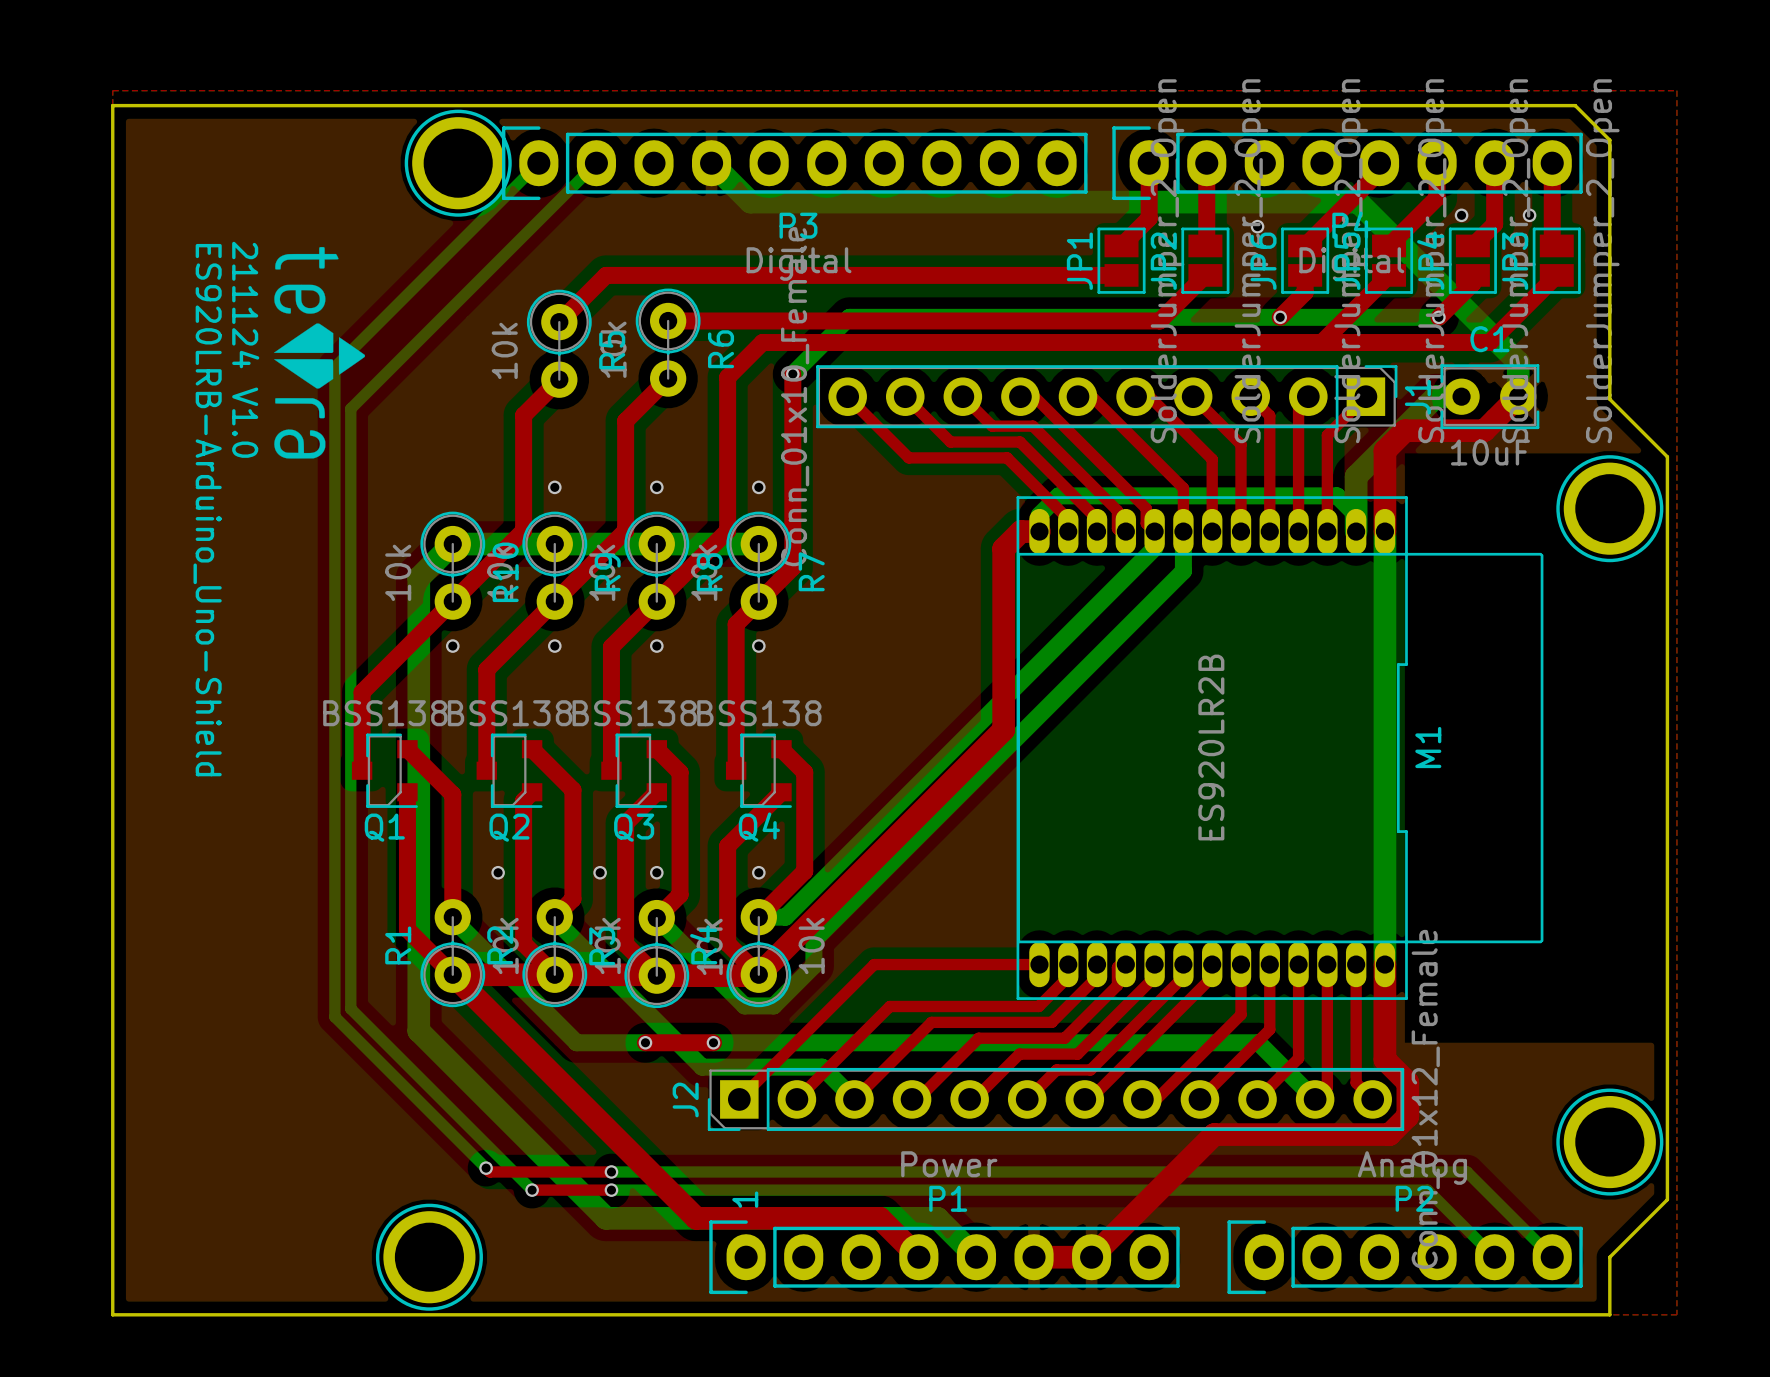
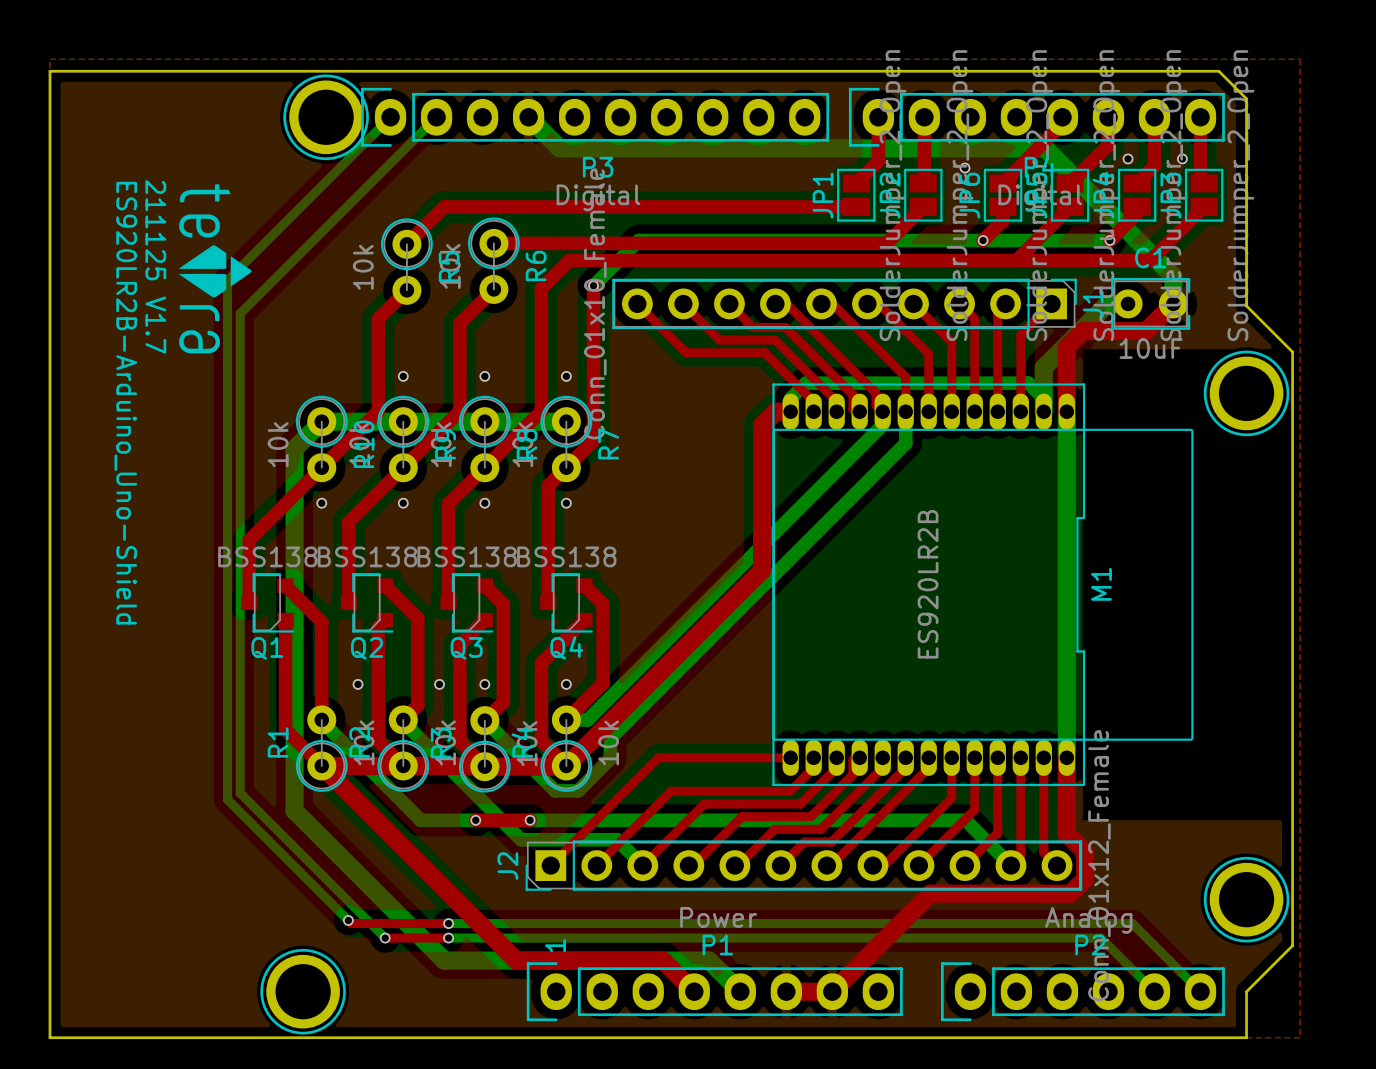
text: 211124 V1.0 (245, 349) -> 211125 V1.7 (155, 266)
text: ES920LRB-Arduino_Uno-Shield (207, 510) -> ES920LR2B-Arduino_Uno-Shield (125, 403)

